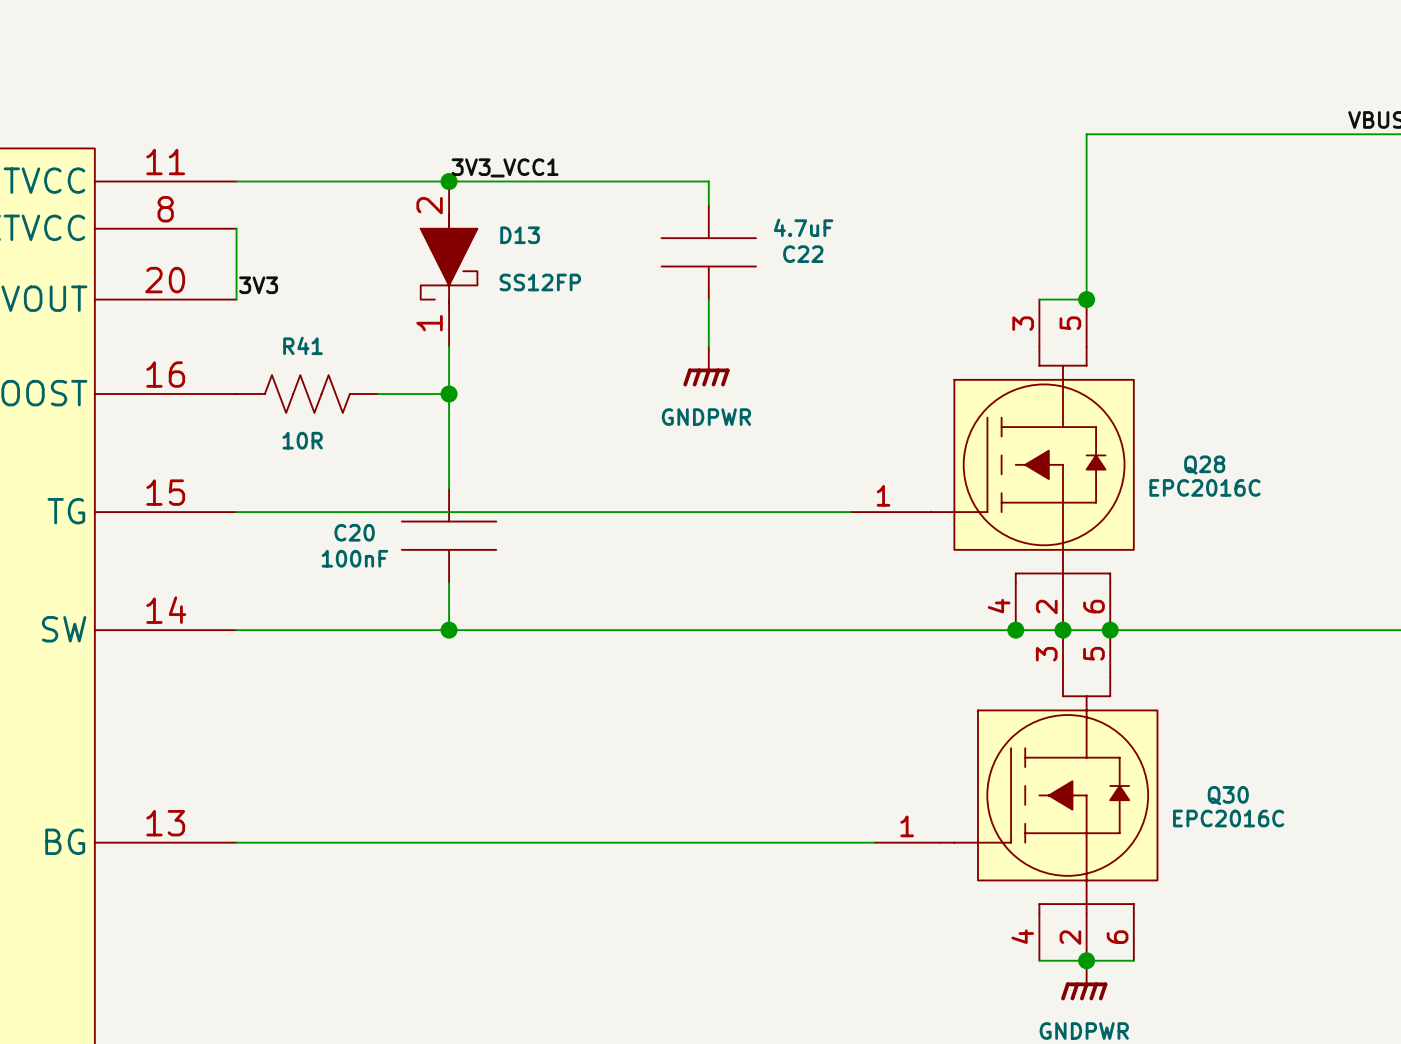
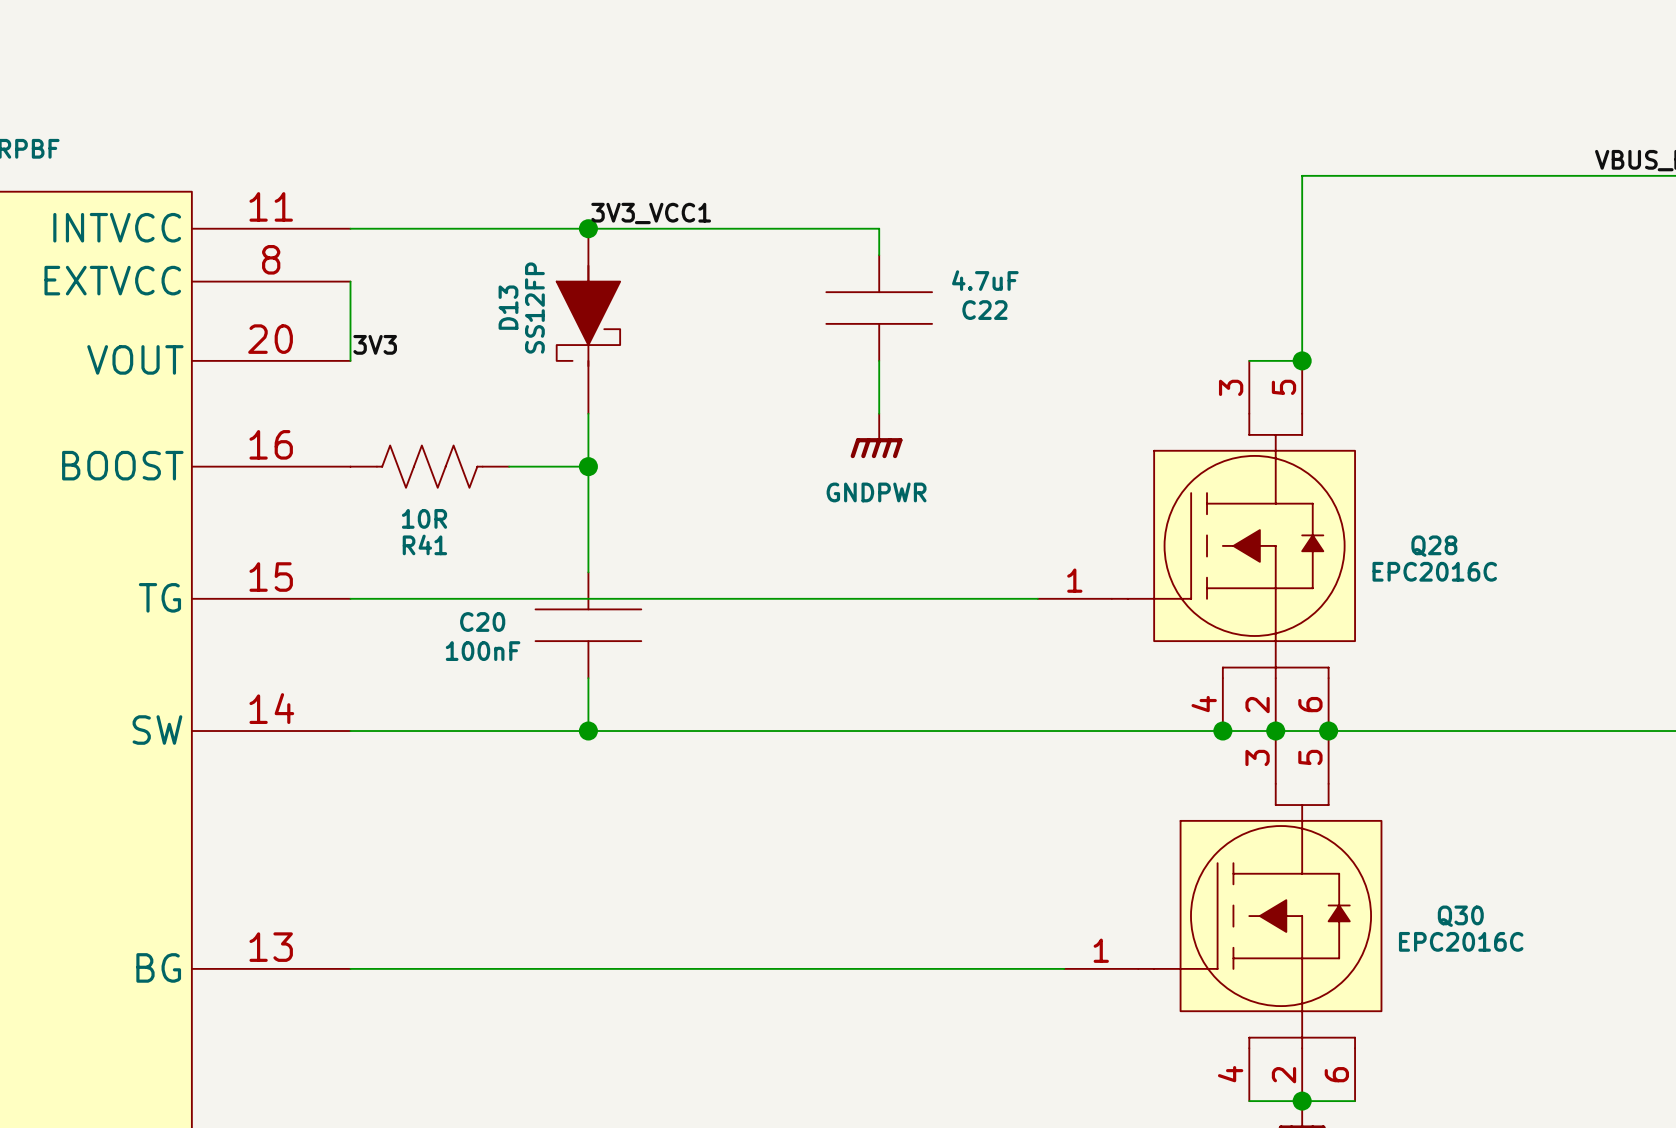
D13 pin number: 2 (429, 205) -> none
D13 name rotation: 0° (520, 235) -> 90° counterclockwise (508, 307)
D13 name position: D13 (520, 235) -> D13 (508, 307)
D13 value rotation: 0° (540, 282) -> 90° counterclockwise (534, 308)
D13 value position: SS12FP (540, 282) -> SS12FP (534, 308)
D13 pin number: 1 (429, 323) -> none
R41 name position: R41 (303, 345) -> R41 (424, 544)

